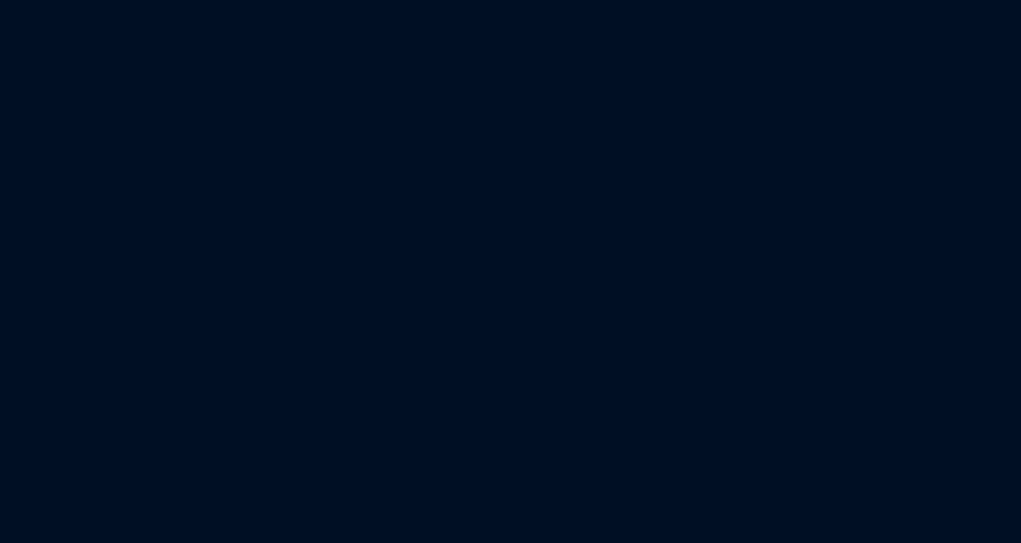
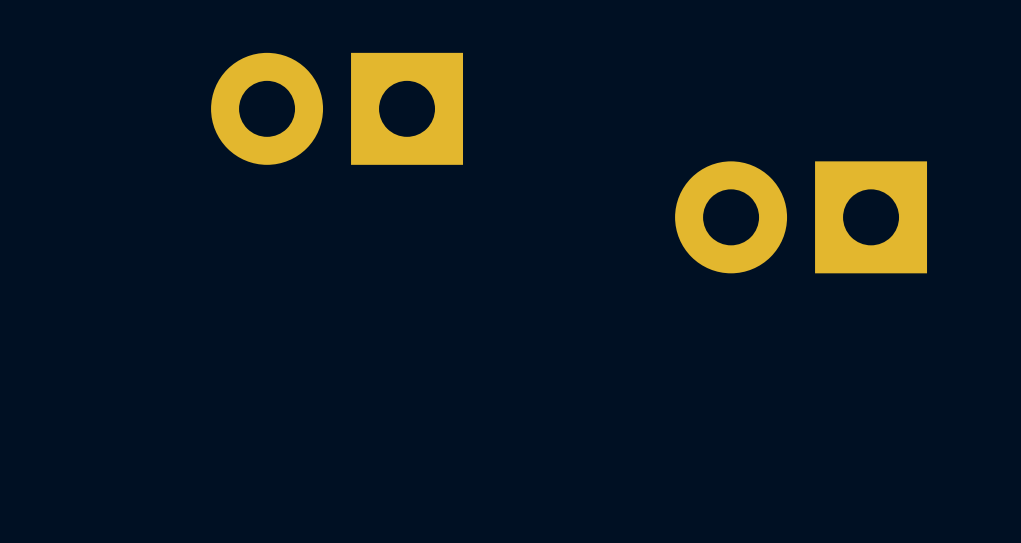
part: none -> (337, 108)
part: none -> (801, 217)

